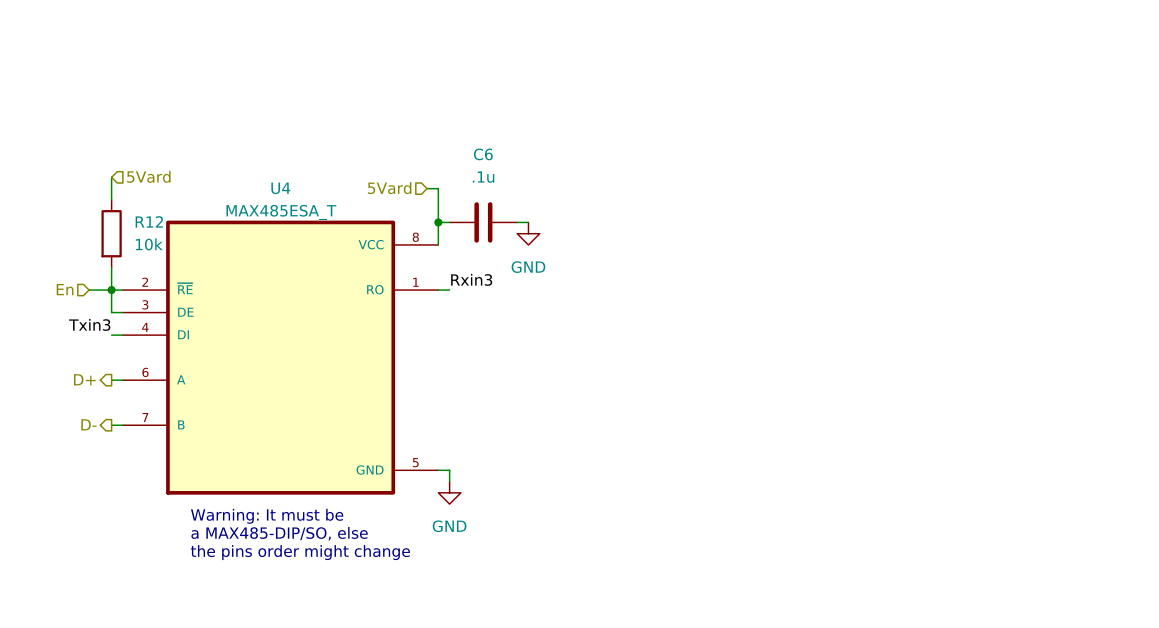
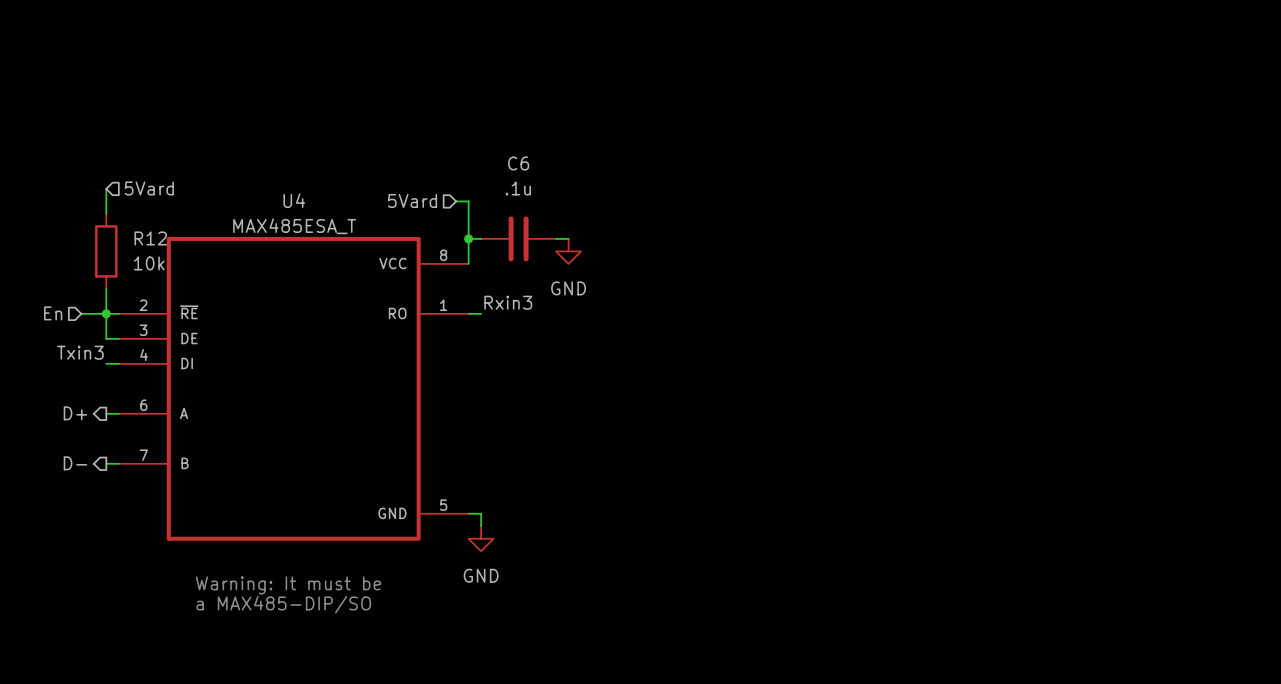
text: Warning: It must be (267, 516) -> none
text: a MAX485-DIP/SO, else (279, 533) -> Warning: It must be (288, 585)
text: the pins order might change (300, 552) -> a MAX485-DIP/SO (283, 604)

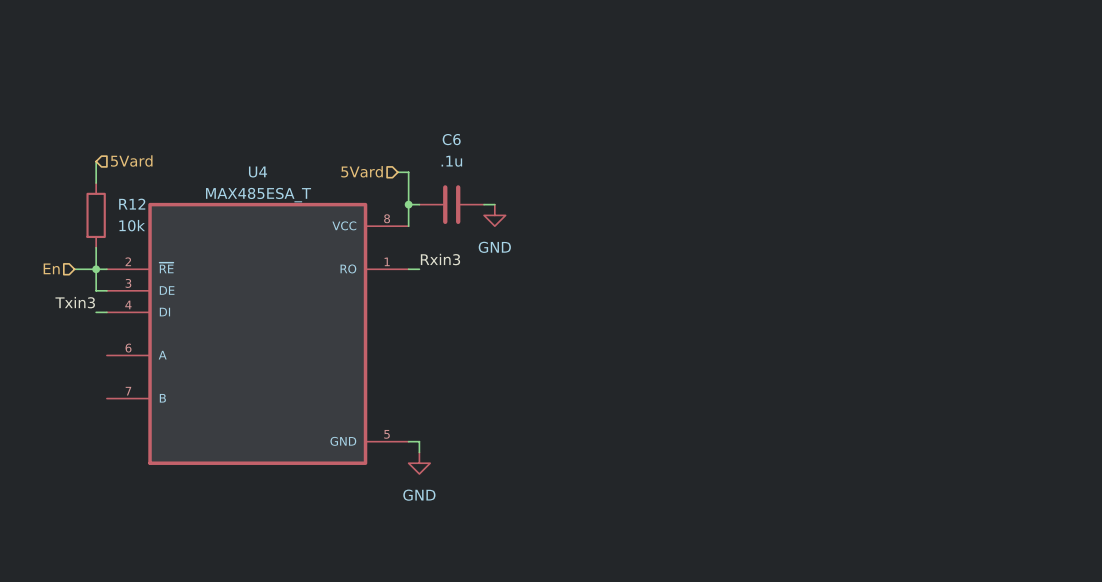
hierarchical label: D+ (75, 413) -> none
wire: (106, 413) (118, 413) -> none
hierarchical label: D- (75, 463) -> none
wire: (106, 463) (118, 463) -> none
text: Warning: It must be (288, 585) -> none
text: a MAX485-DIP/SO (283, 604) -> none

